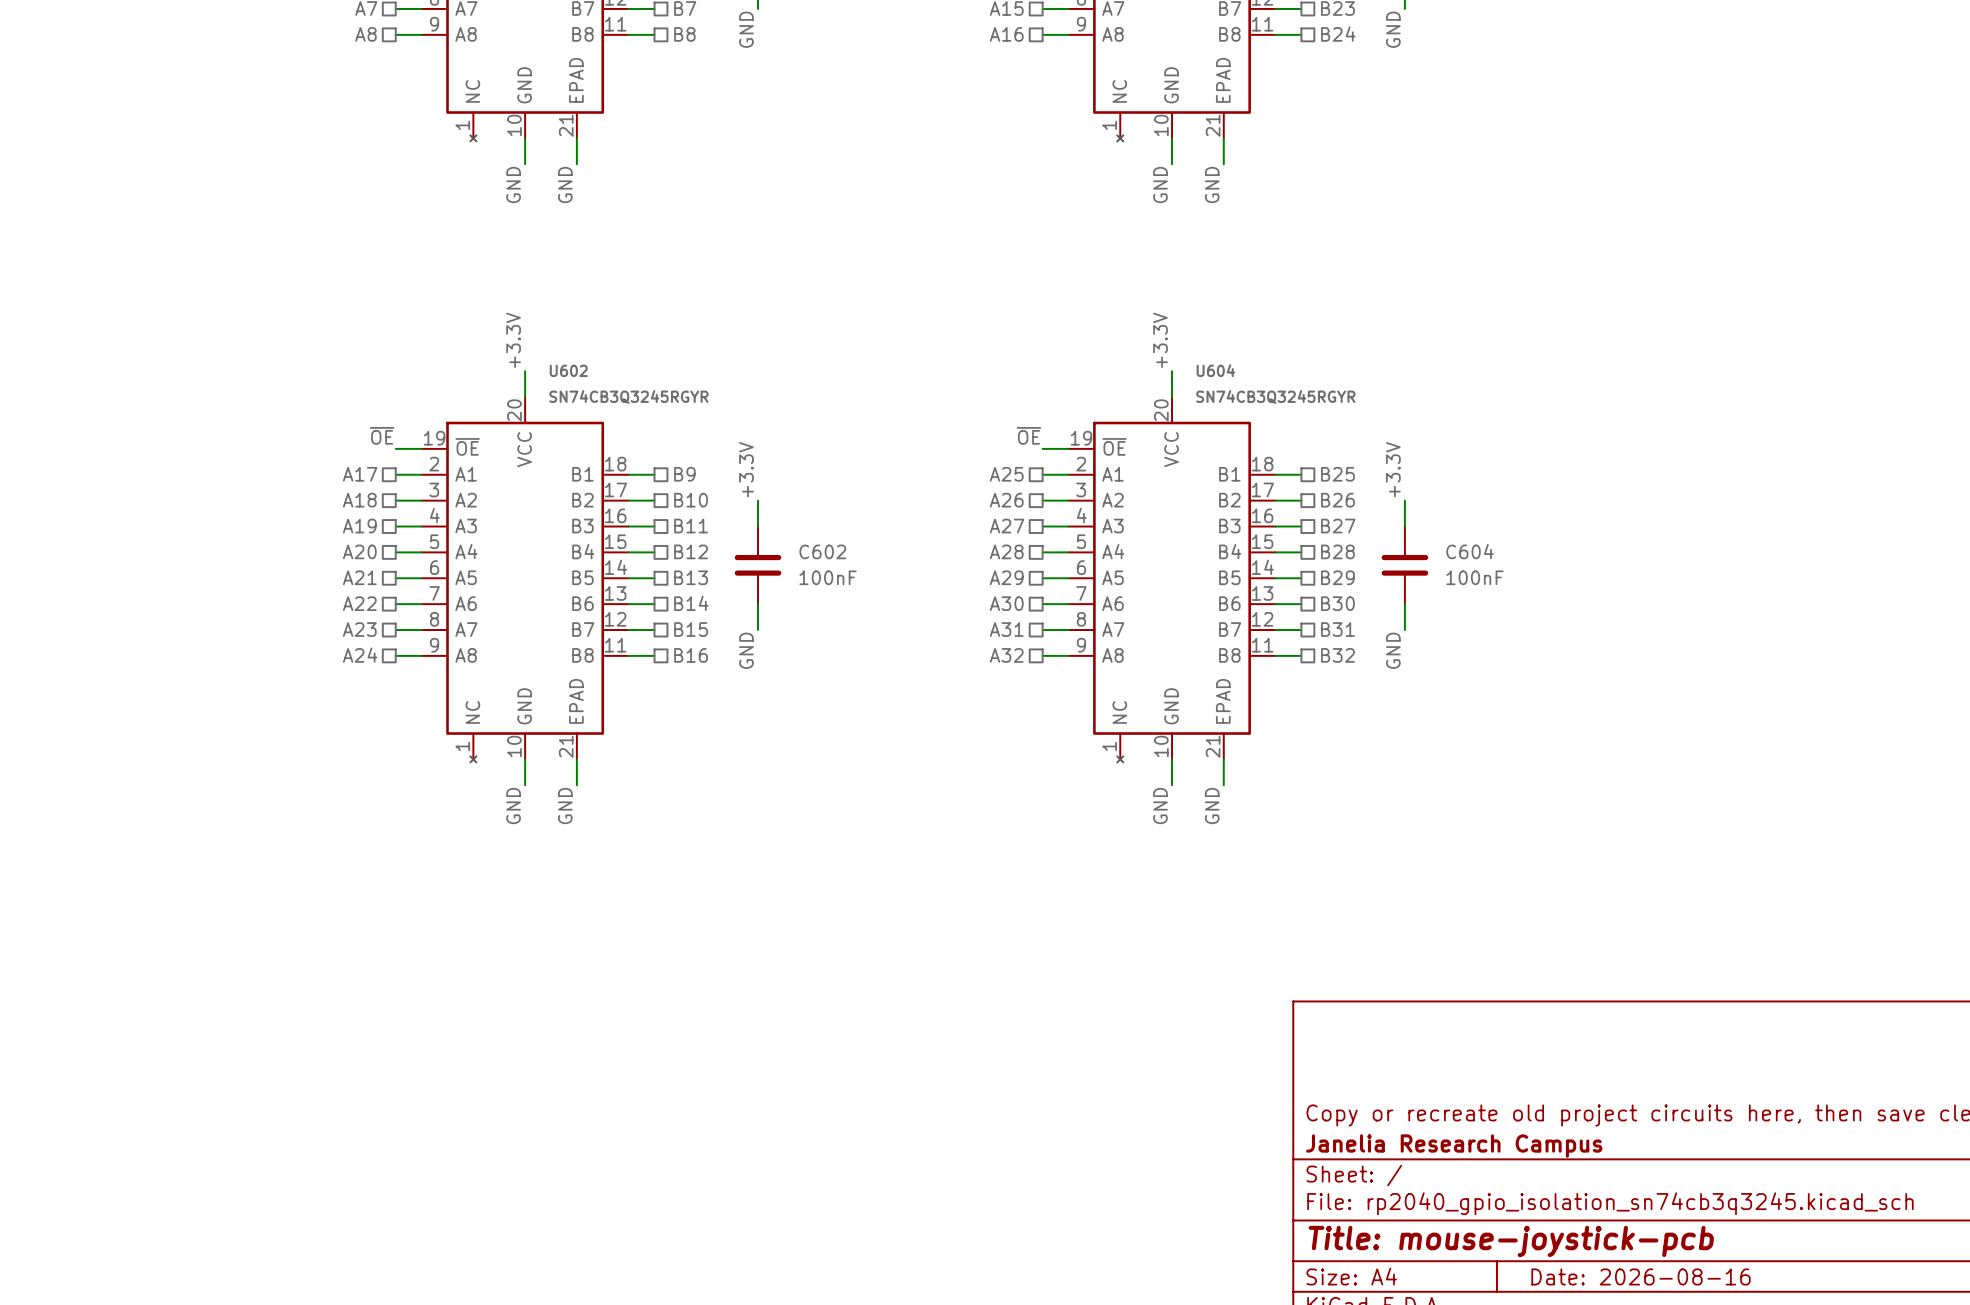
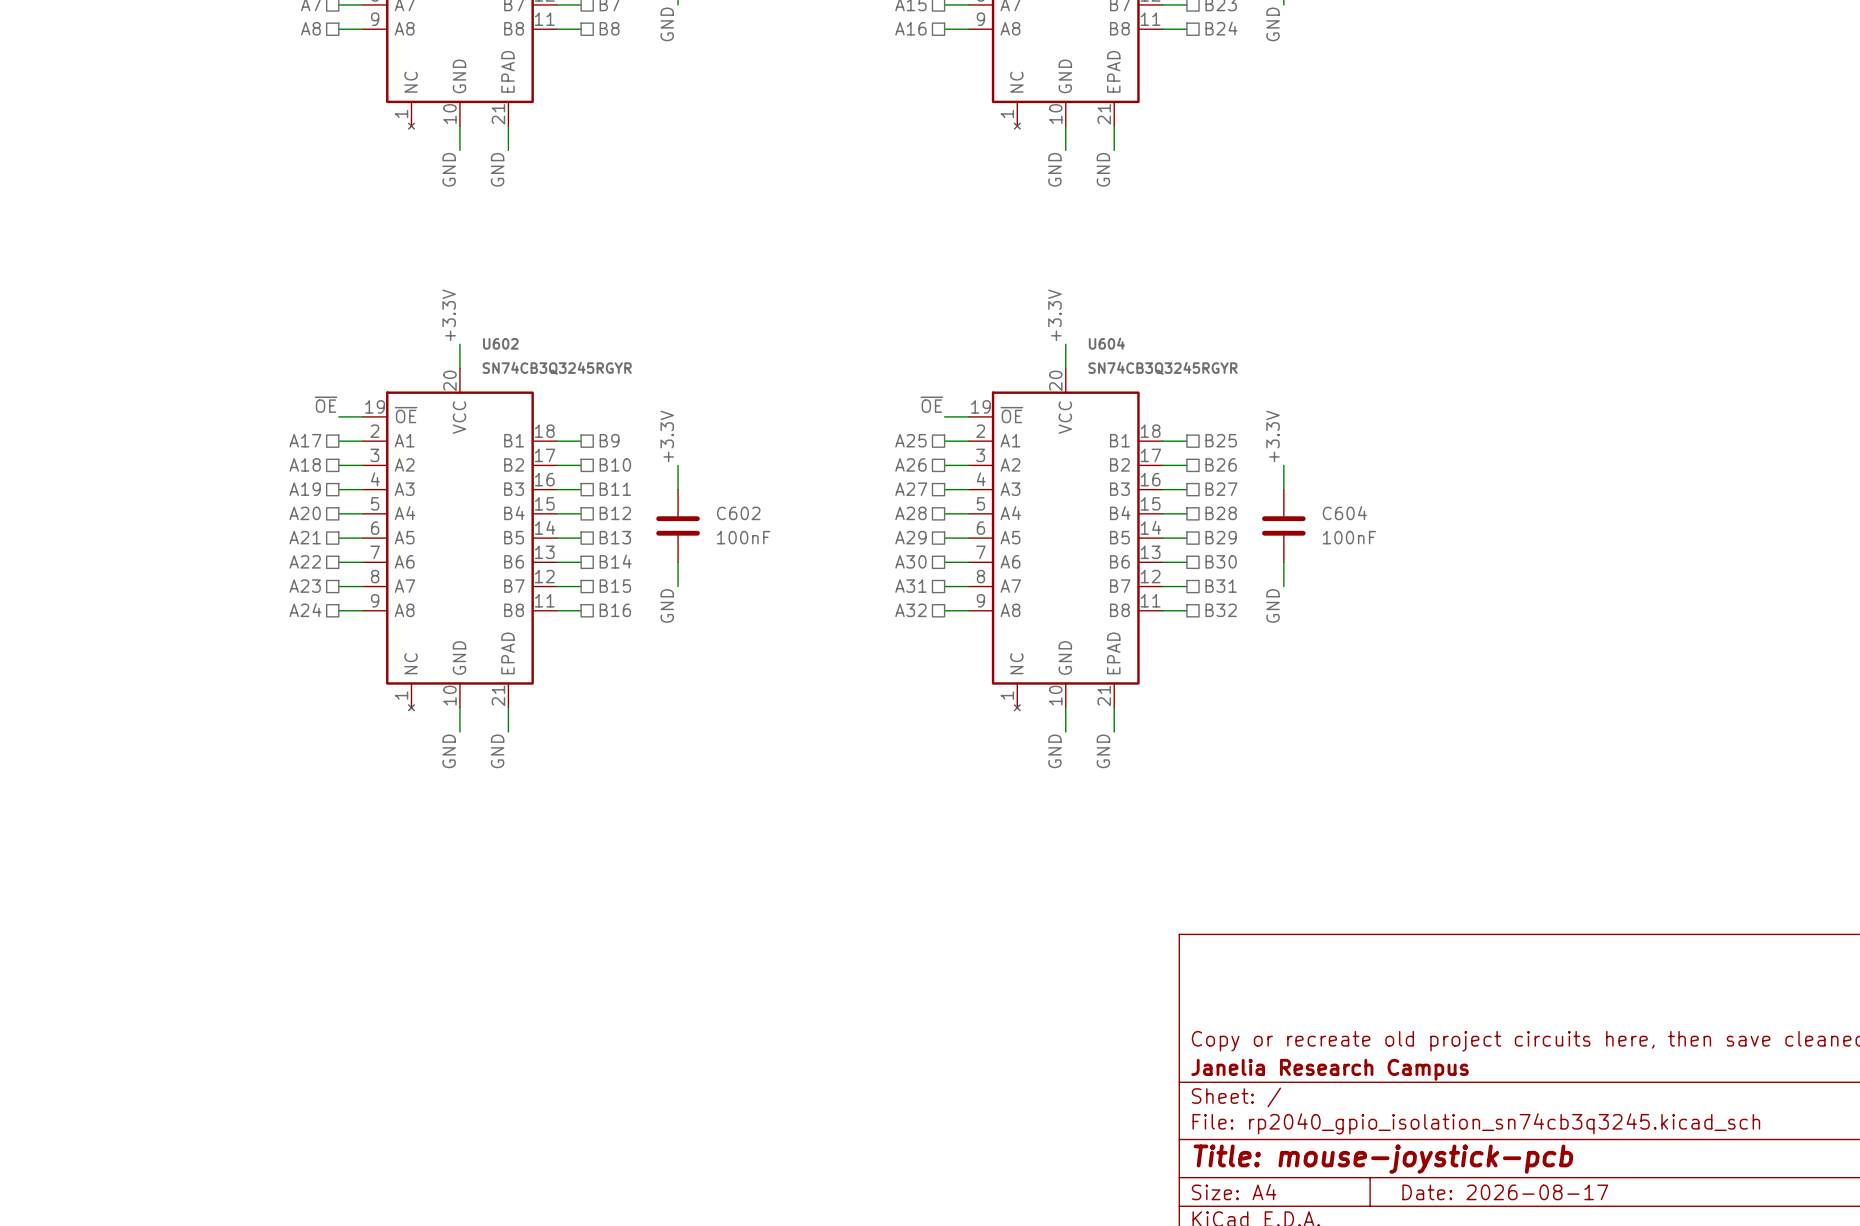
title block: Date: 2026-08-16 (1641, 1276) -> Date: 2026-08-17 (1505, 1192)

